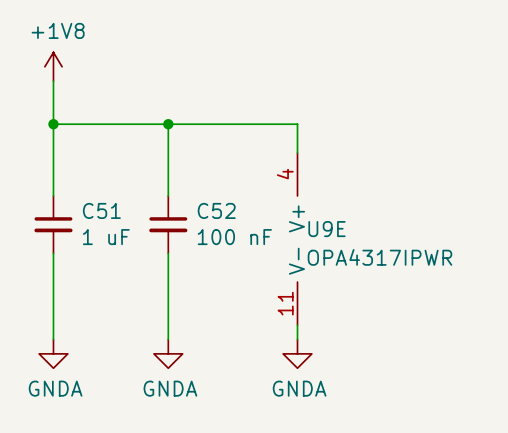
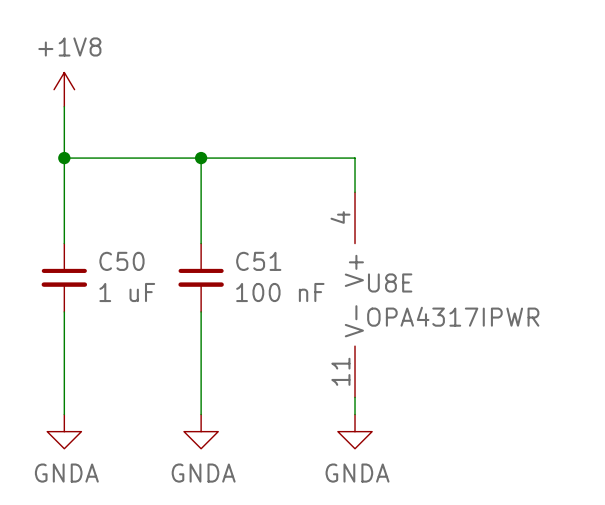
C51 name: C51 (101, 210) -> C50 (121, 261)
C52 name: C52 (216, 210) -> C51 (258, 261)
U9E name: U9E (326, 229) -> U8E (390, 282)

